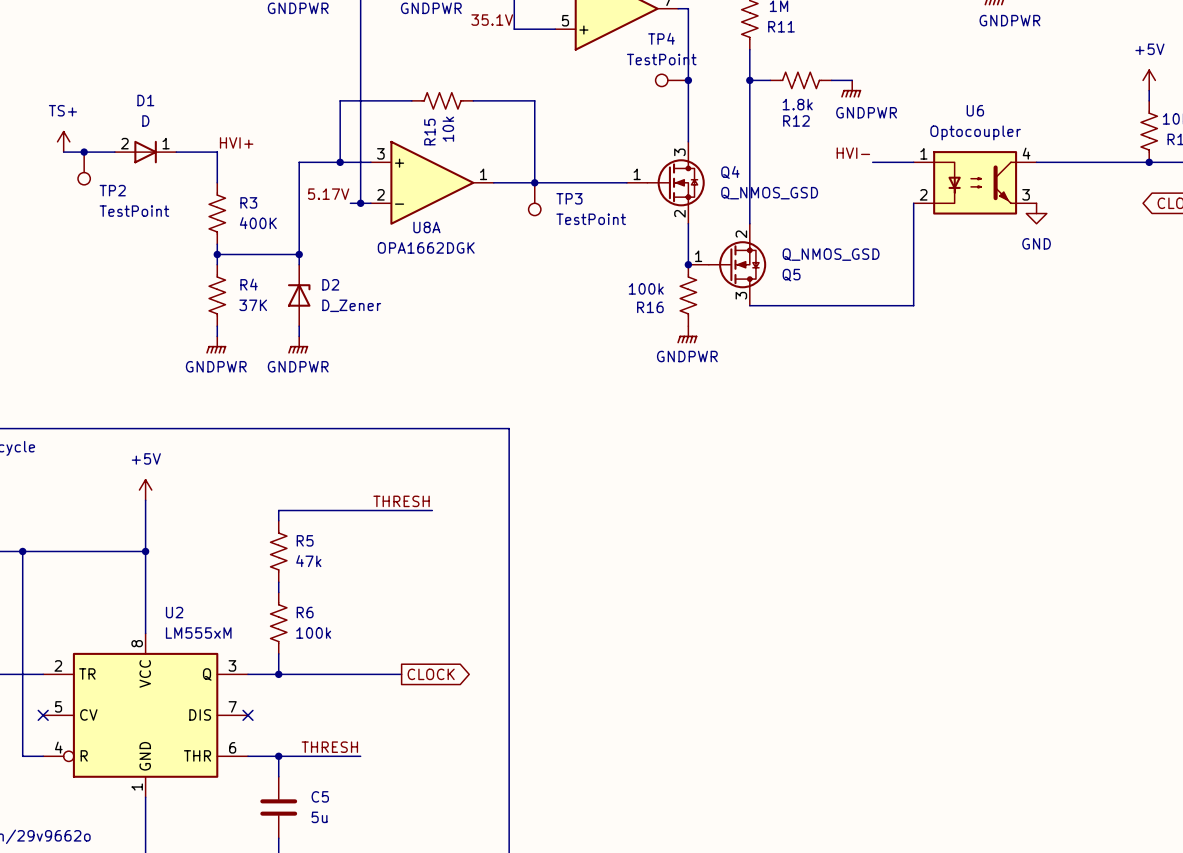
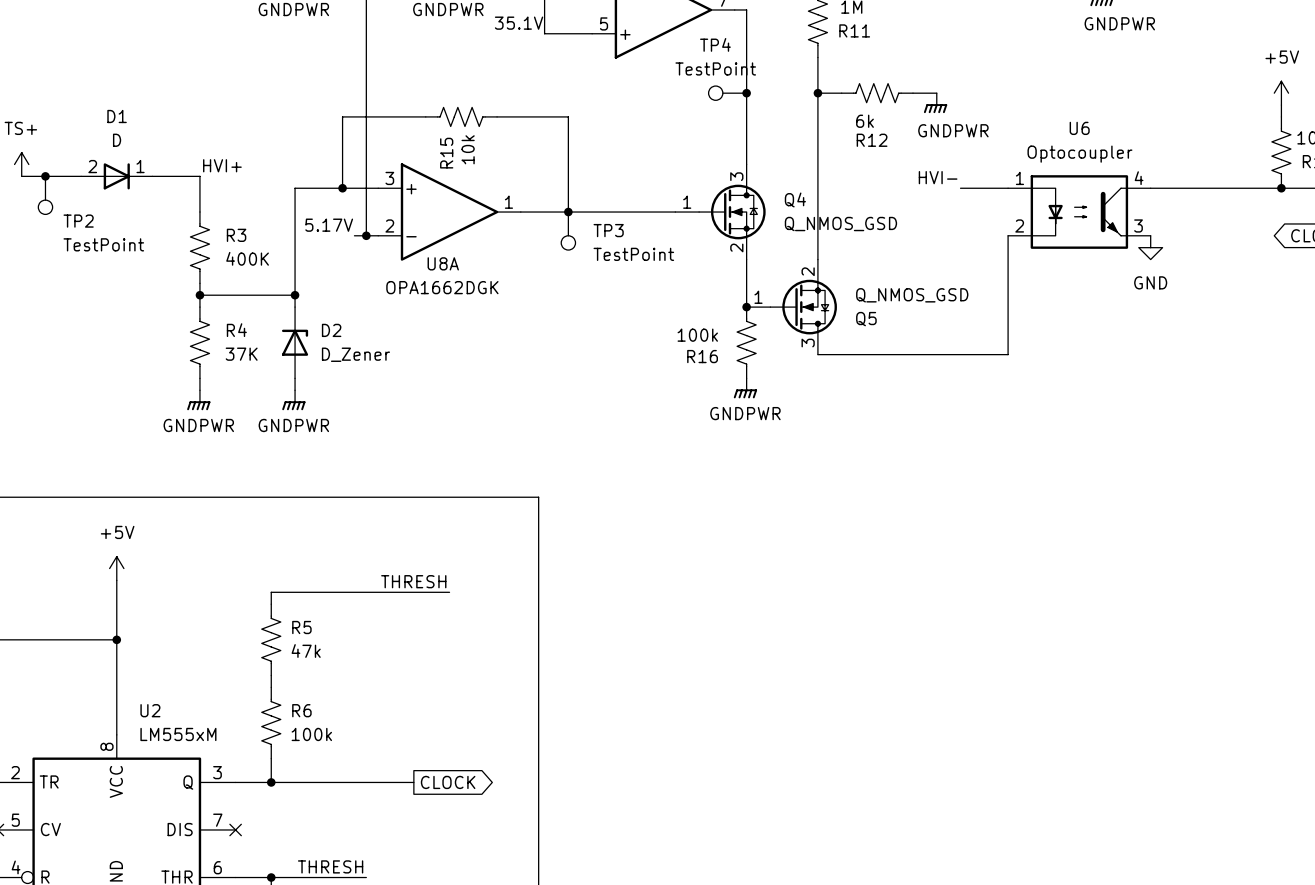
R12 value: 1.8k (797, 104) -> 6k (864, 121)

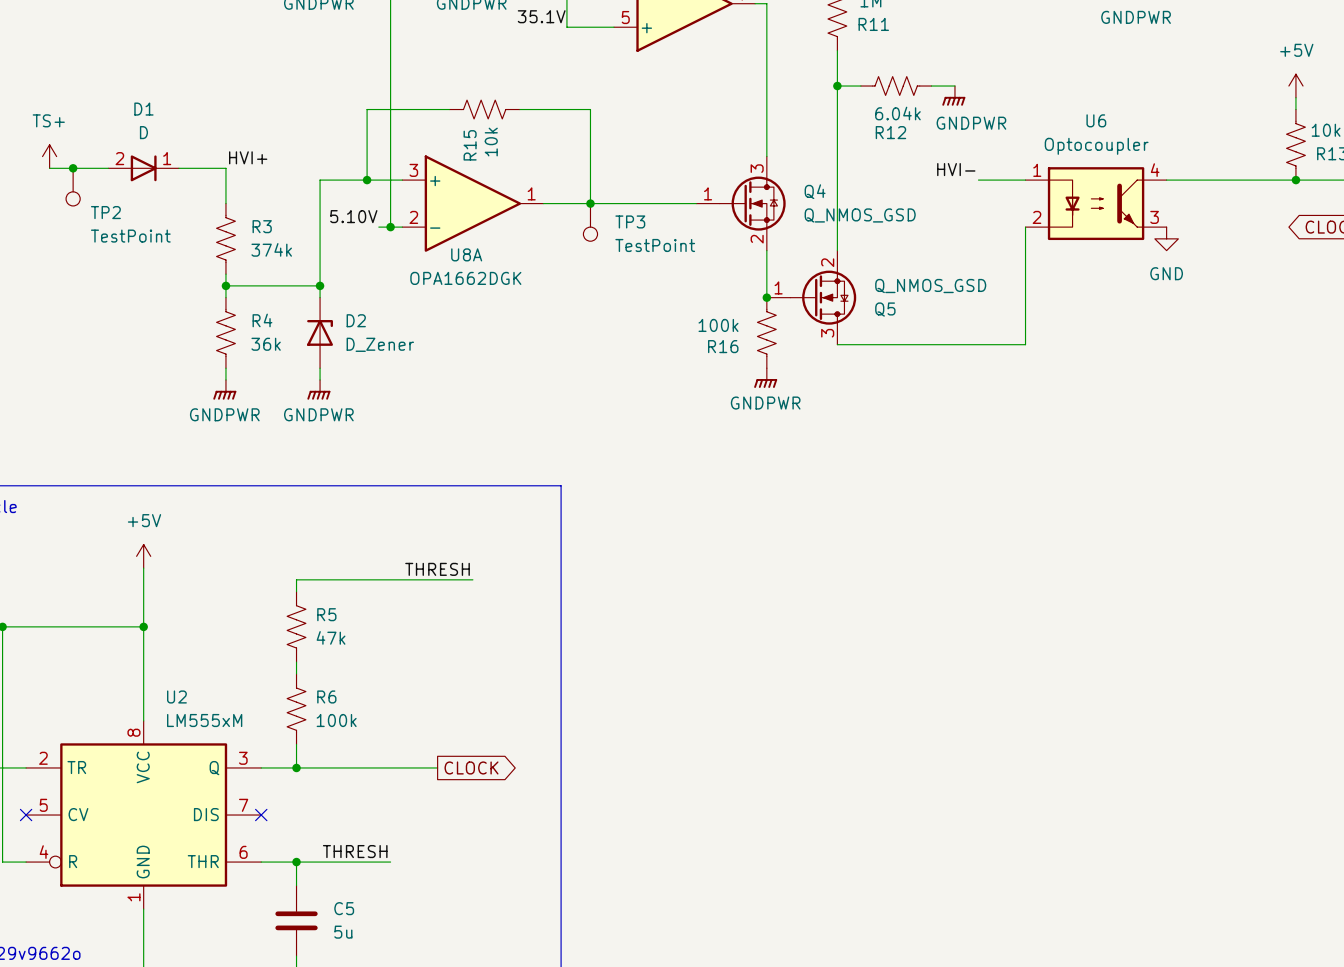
TP4: TestPoint (727, 93) -> none
junction: (746, 93) -> none
R12 value: 6k (864, 121) -> 6.04k (897, 113)
label: 5.17V (329, 225) -> 5.10V (353, 216)
R3 value: 400K (247, 258) -> 374k (271, 249)
R4 value: 37K (241, 354) -> 36k (266, 344)

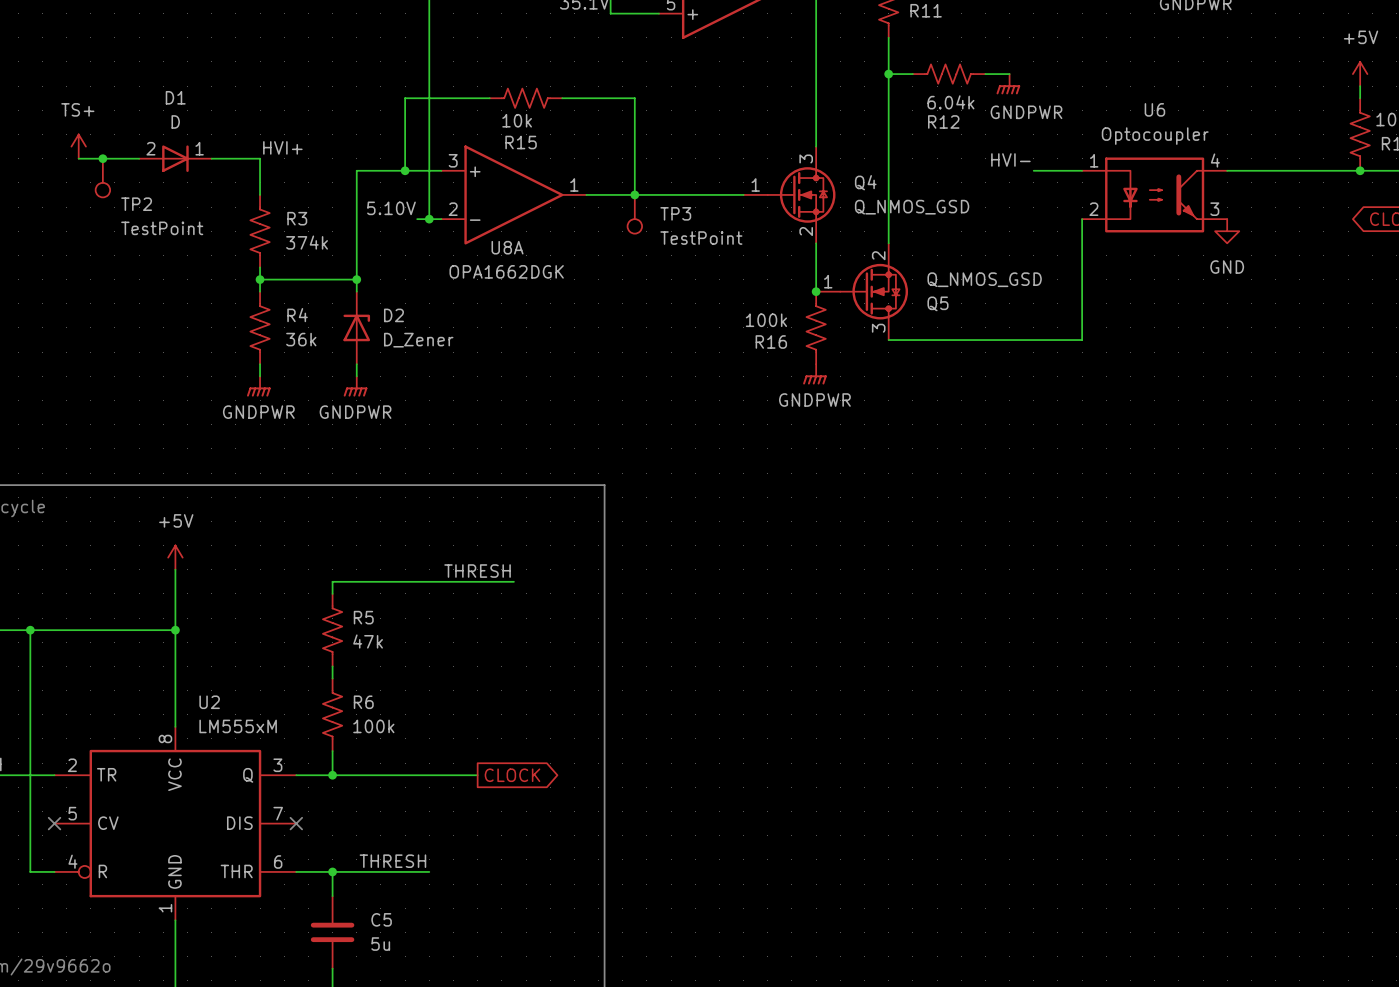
R15 value rotation: 0° (491, 142) -> 90° clockwise (517, 120)
R15 name rotation: 0° (470, 145) -> 90° clockwise (521, 142)

